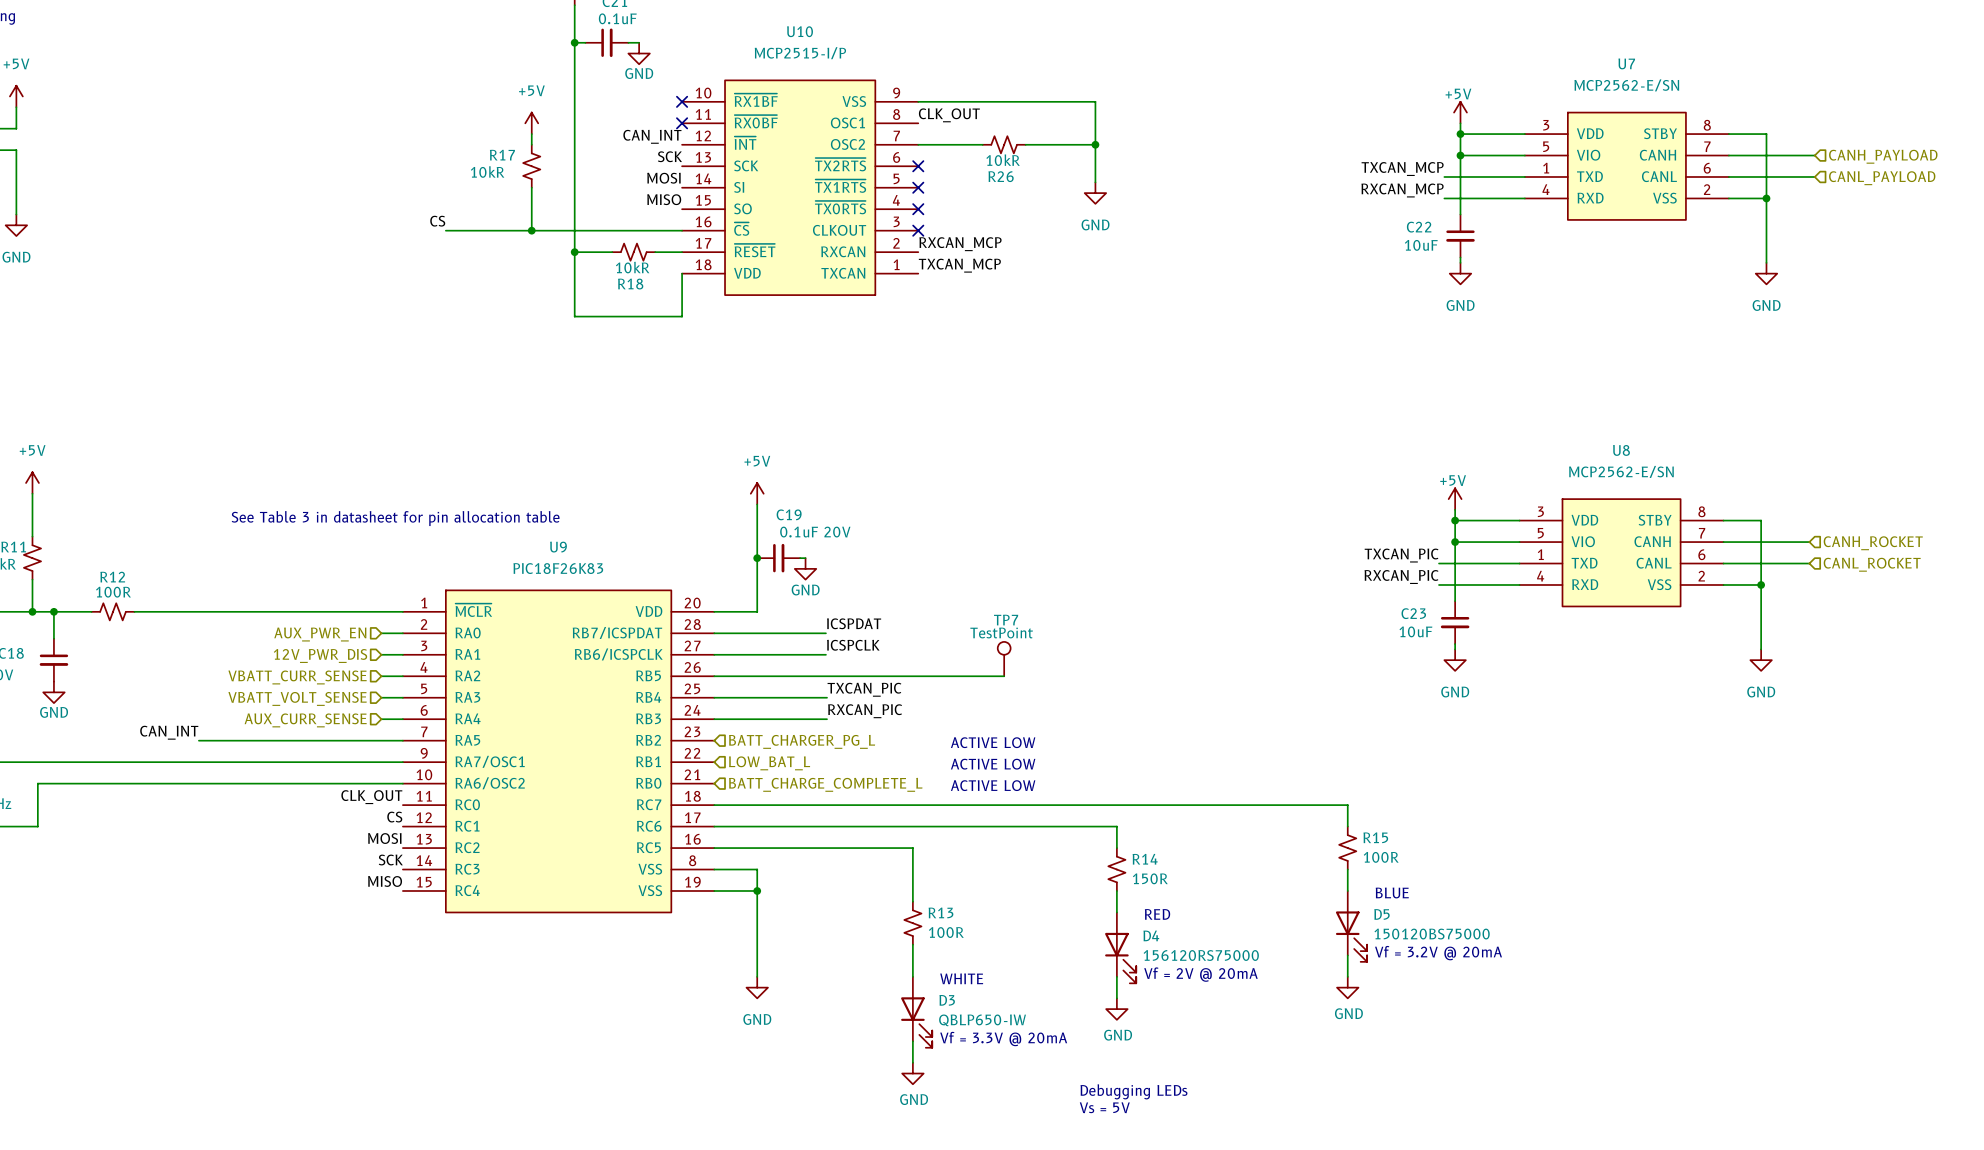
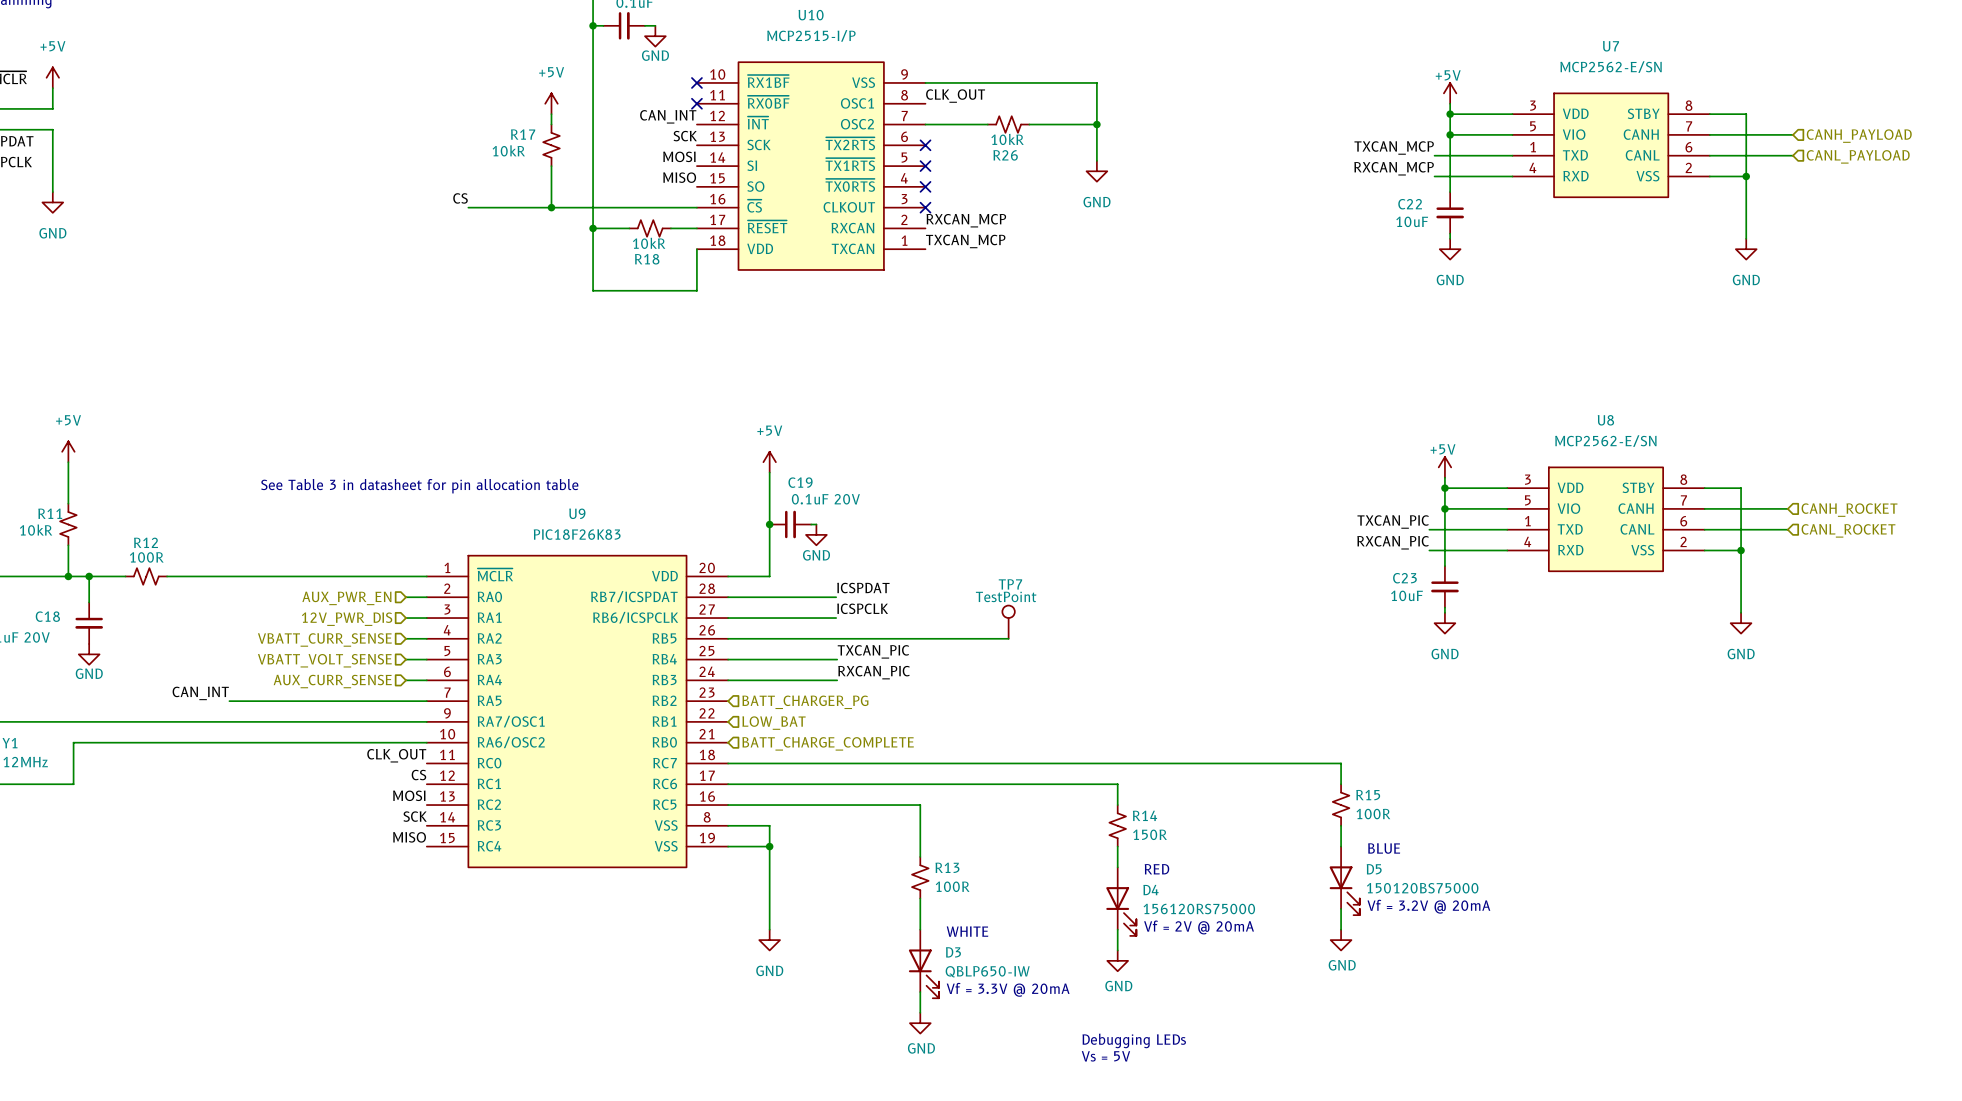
hierarchical label: BATT_CHARGER_PG_L (802, 741) -> BATT_CHARGER_PG (805, 702)
text: ACTIVE LOW (993, 742) -> none
hierarchical label: LOW_BAT_L (769, 763) -> LOW_BAT (774, 723)
text: ACTIVE LOW (993, 764) -> none
hierarchical label: BATT_CHARGE_COMPLETE_L (825, 784) -> BATT_CHARGE_COMPLETE (828, 743)
text: ACTIVE LOW (993, 785) -> none

